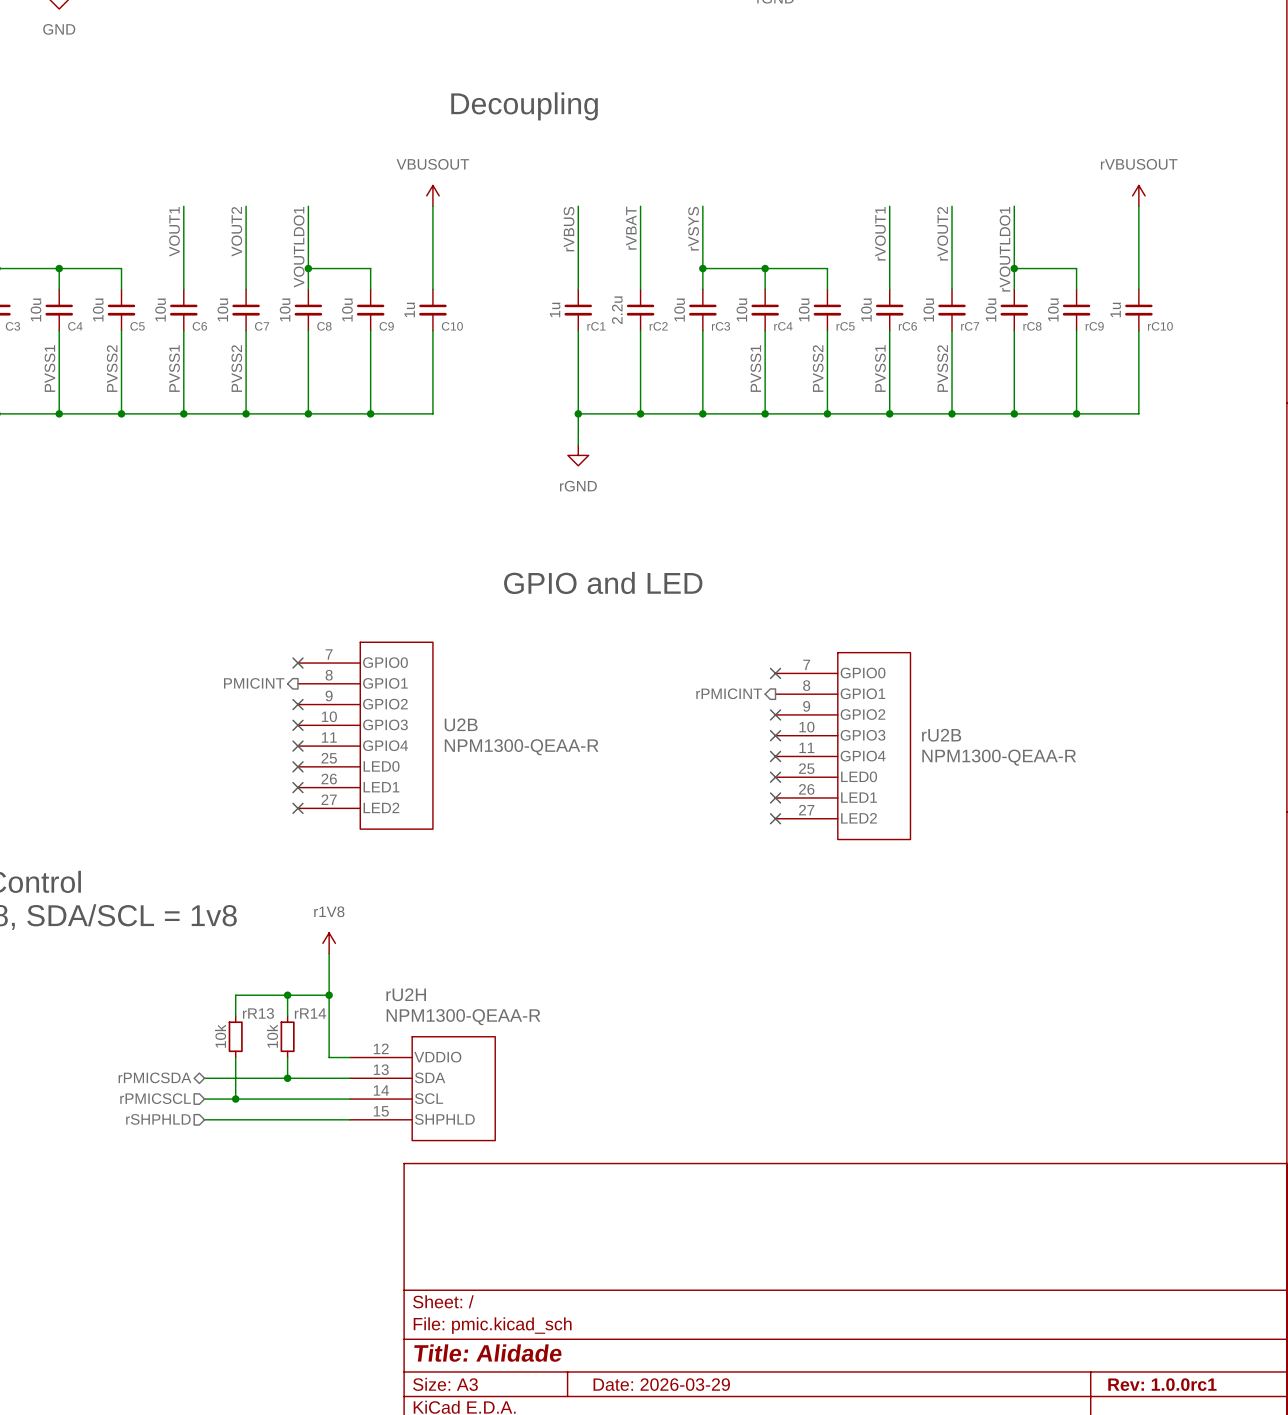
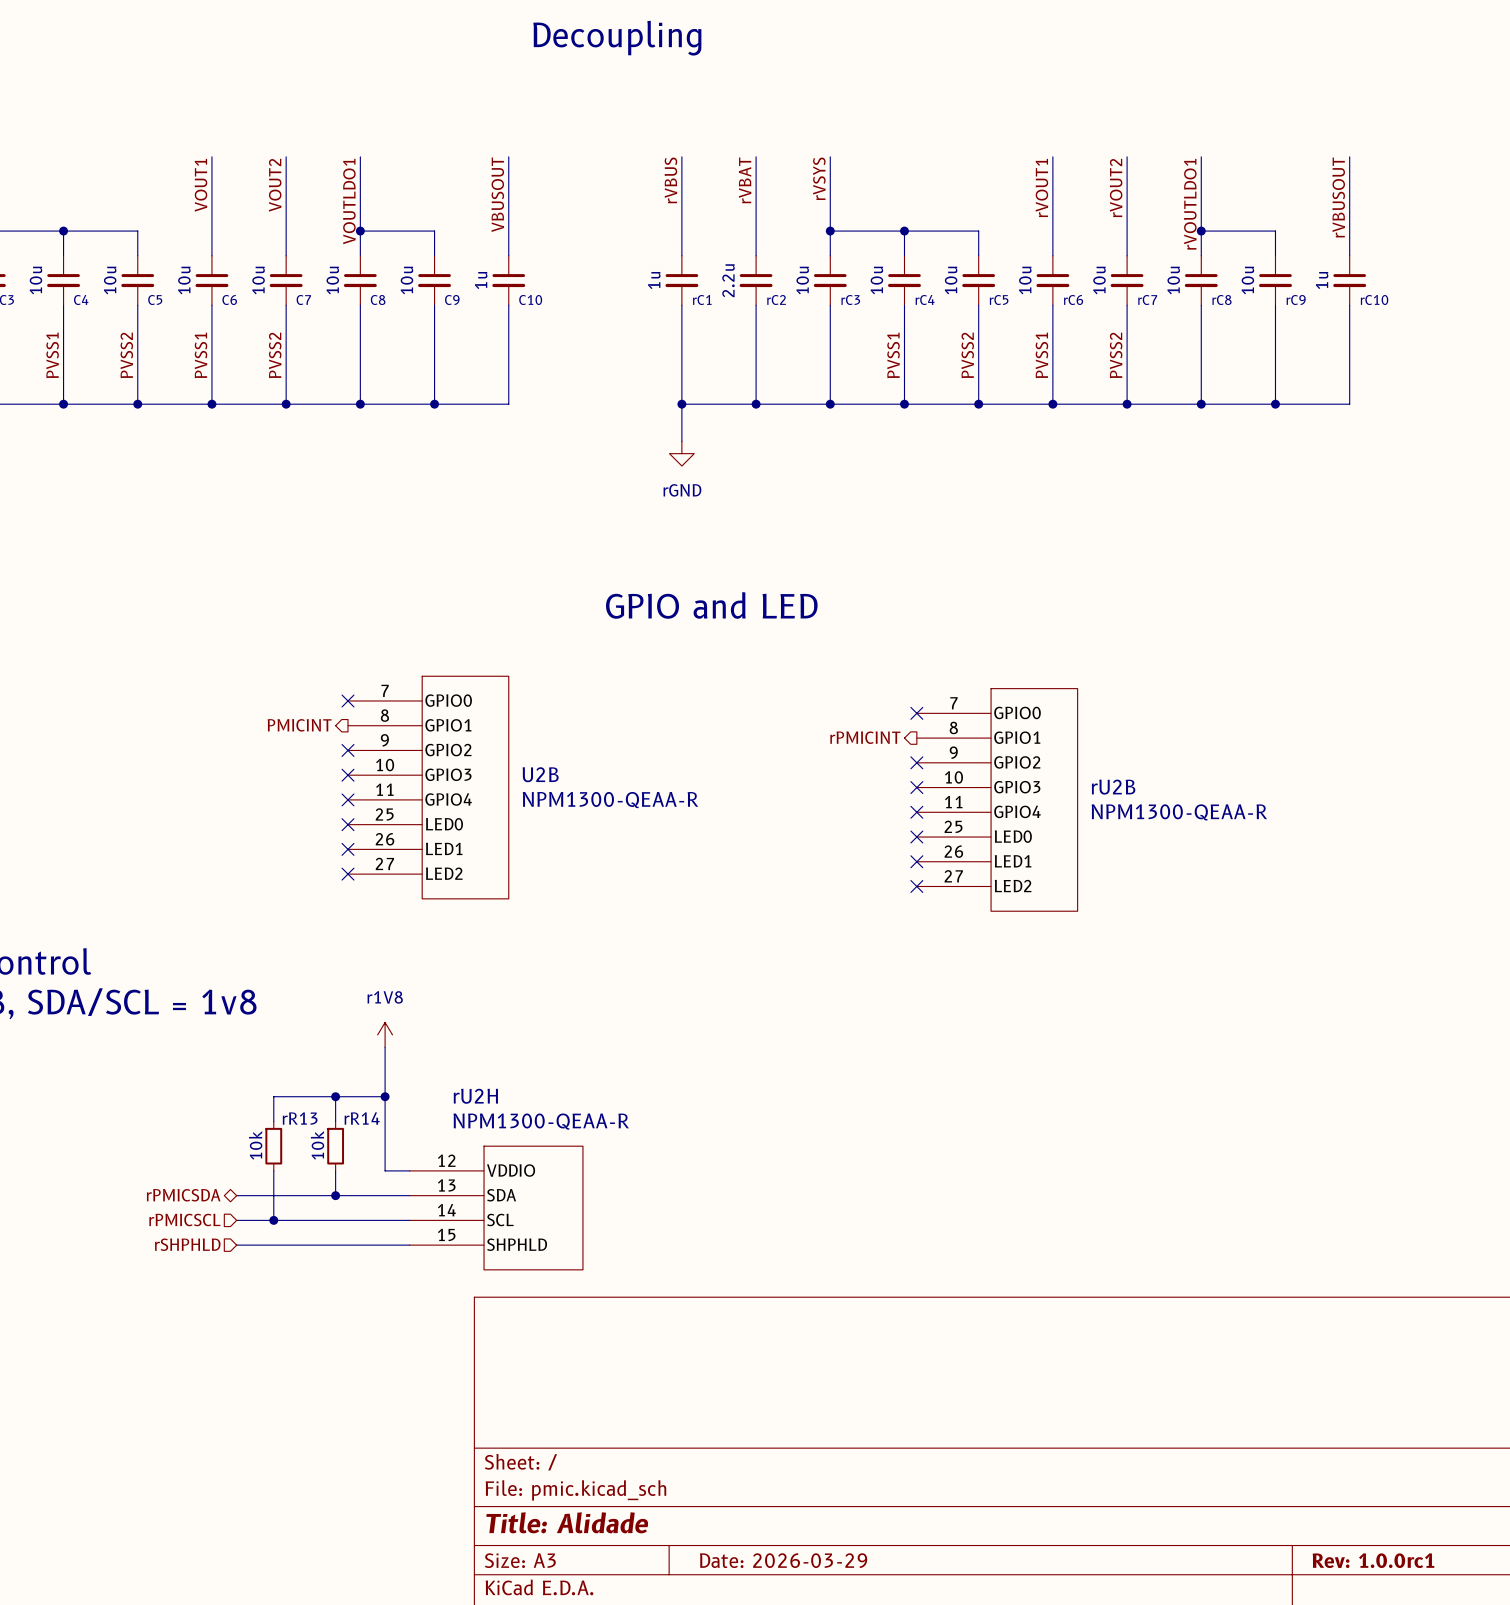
power symbol: VBUSOUT (432, 195) -> none
power symbol: rVBUSOUT (1138, 195) -> none
label: none -> VBUSOUT (497, 194)
label: none -> rVBUSOUT (1338, 197)

